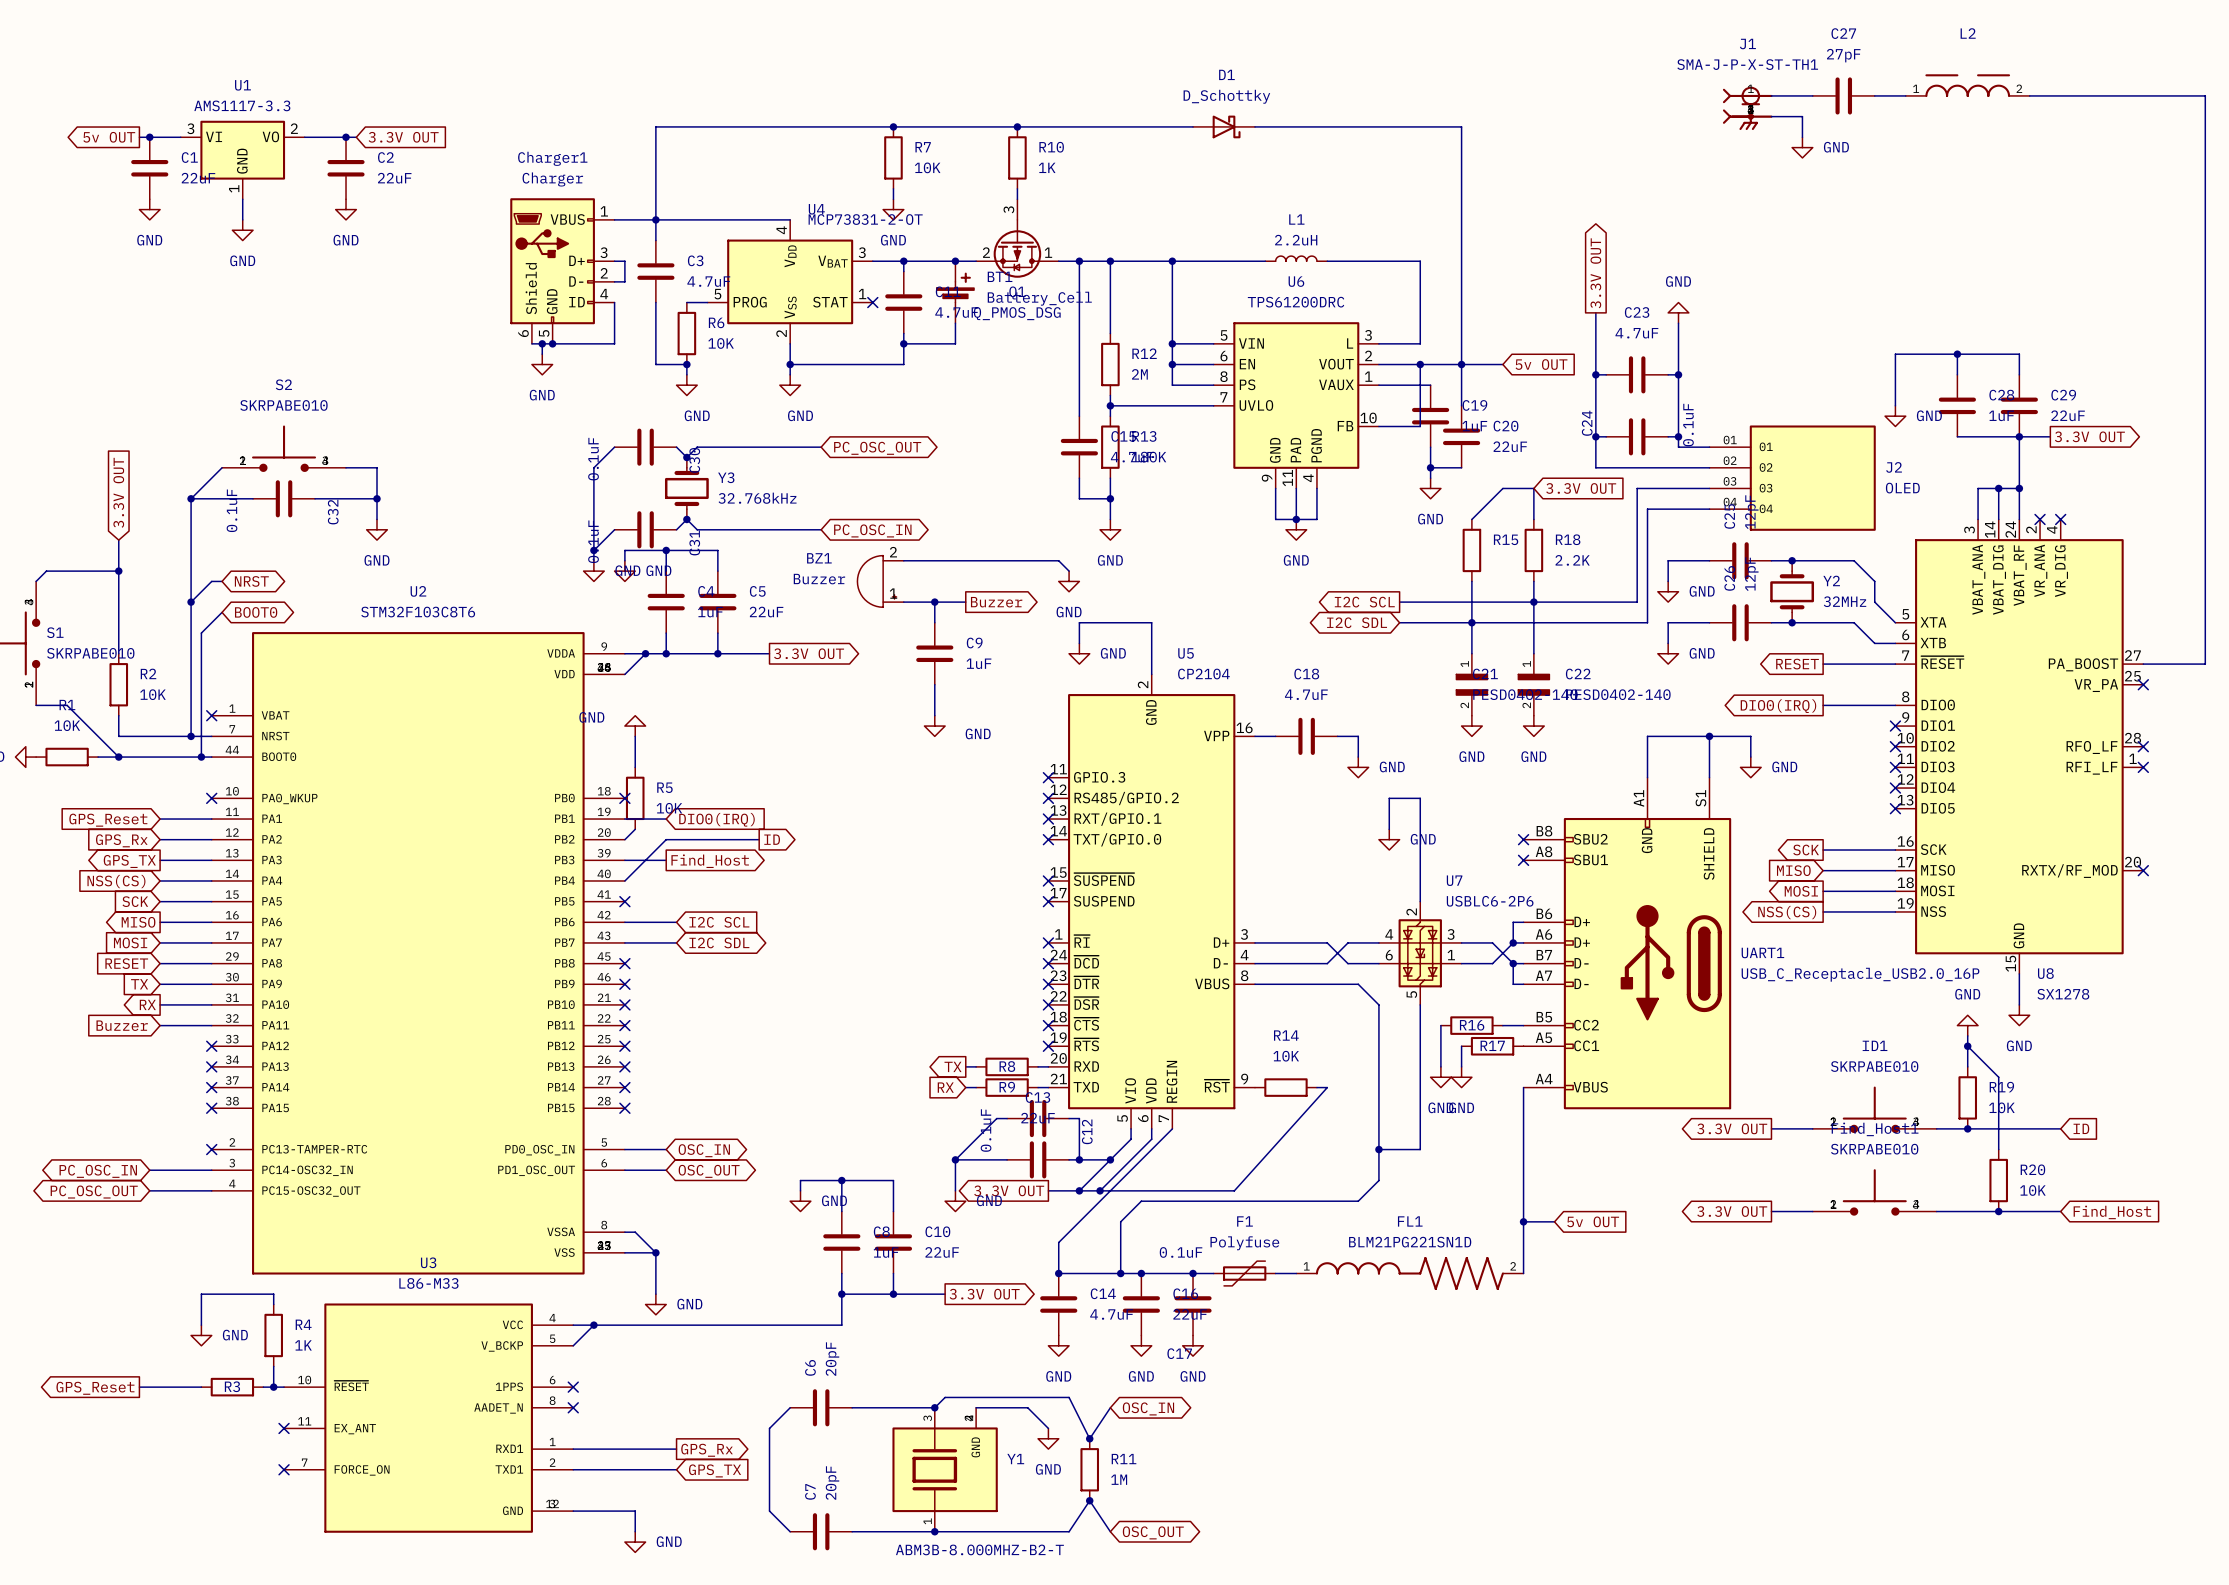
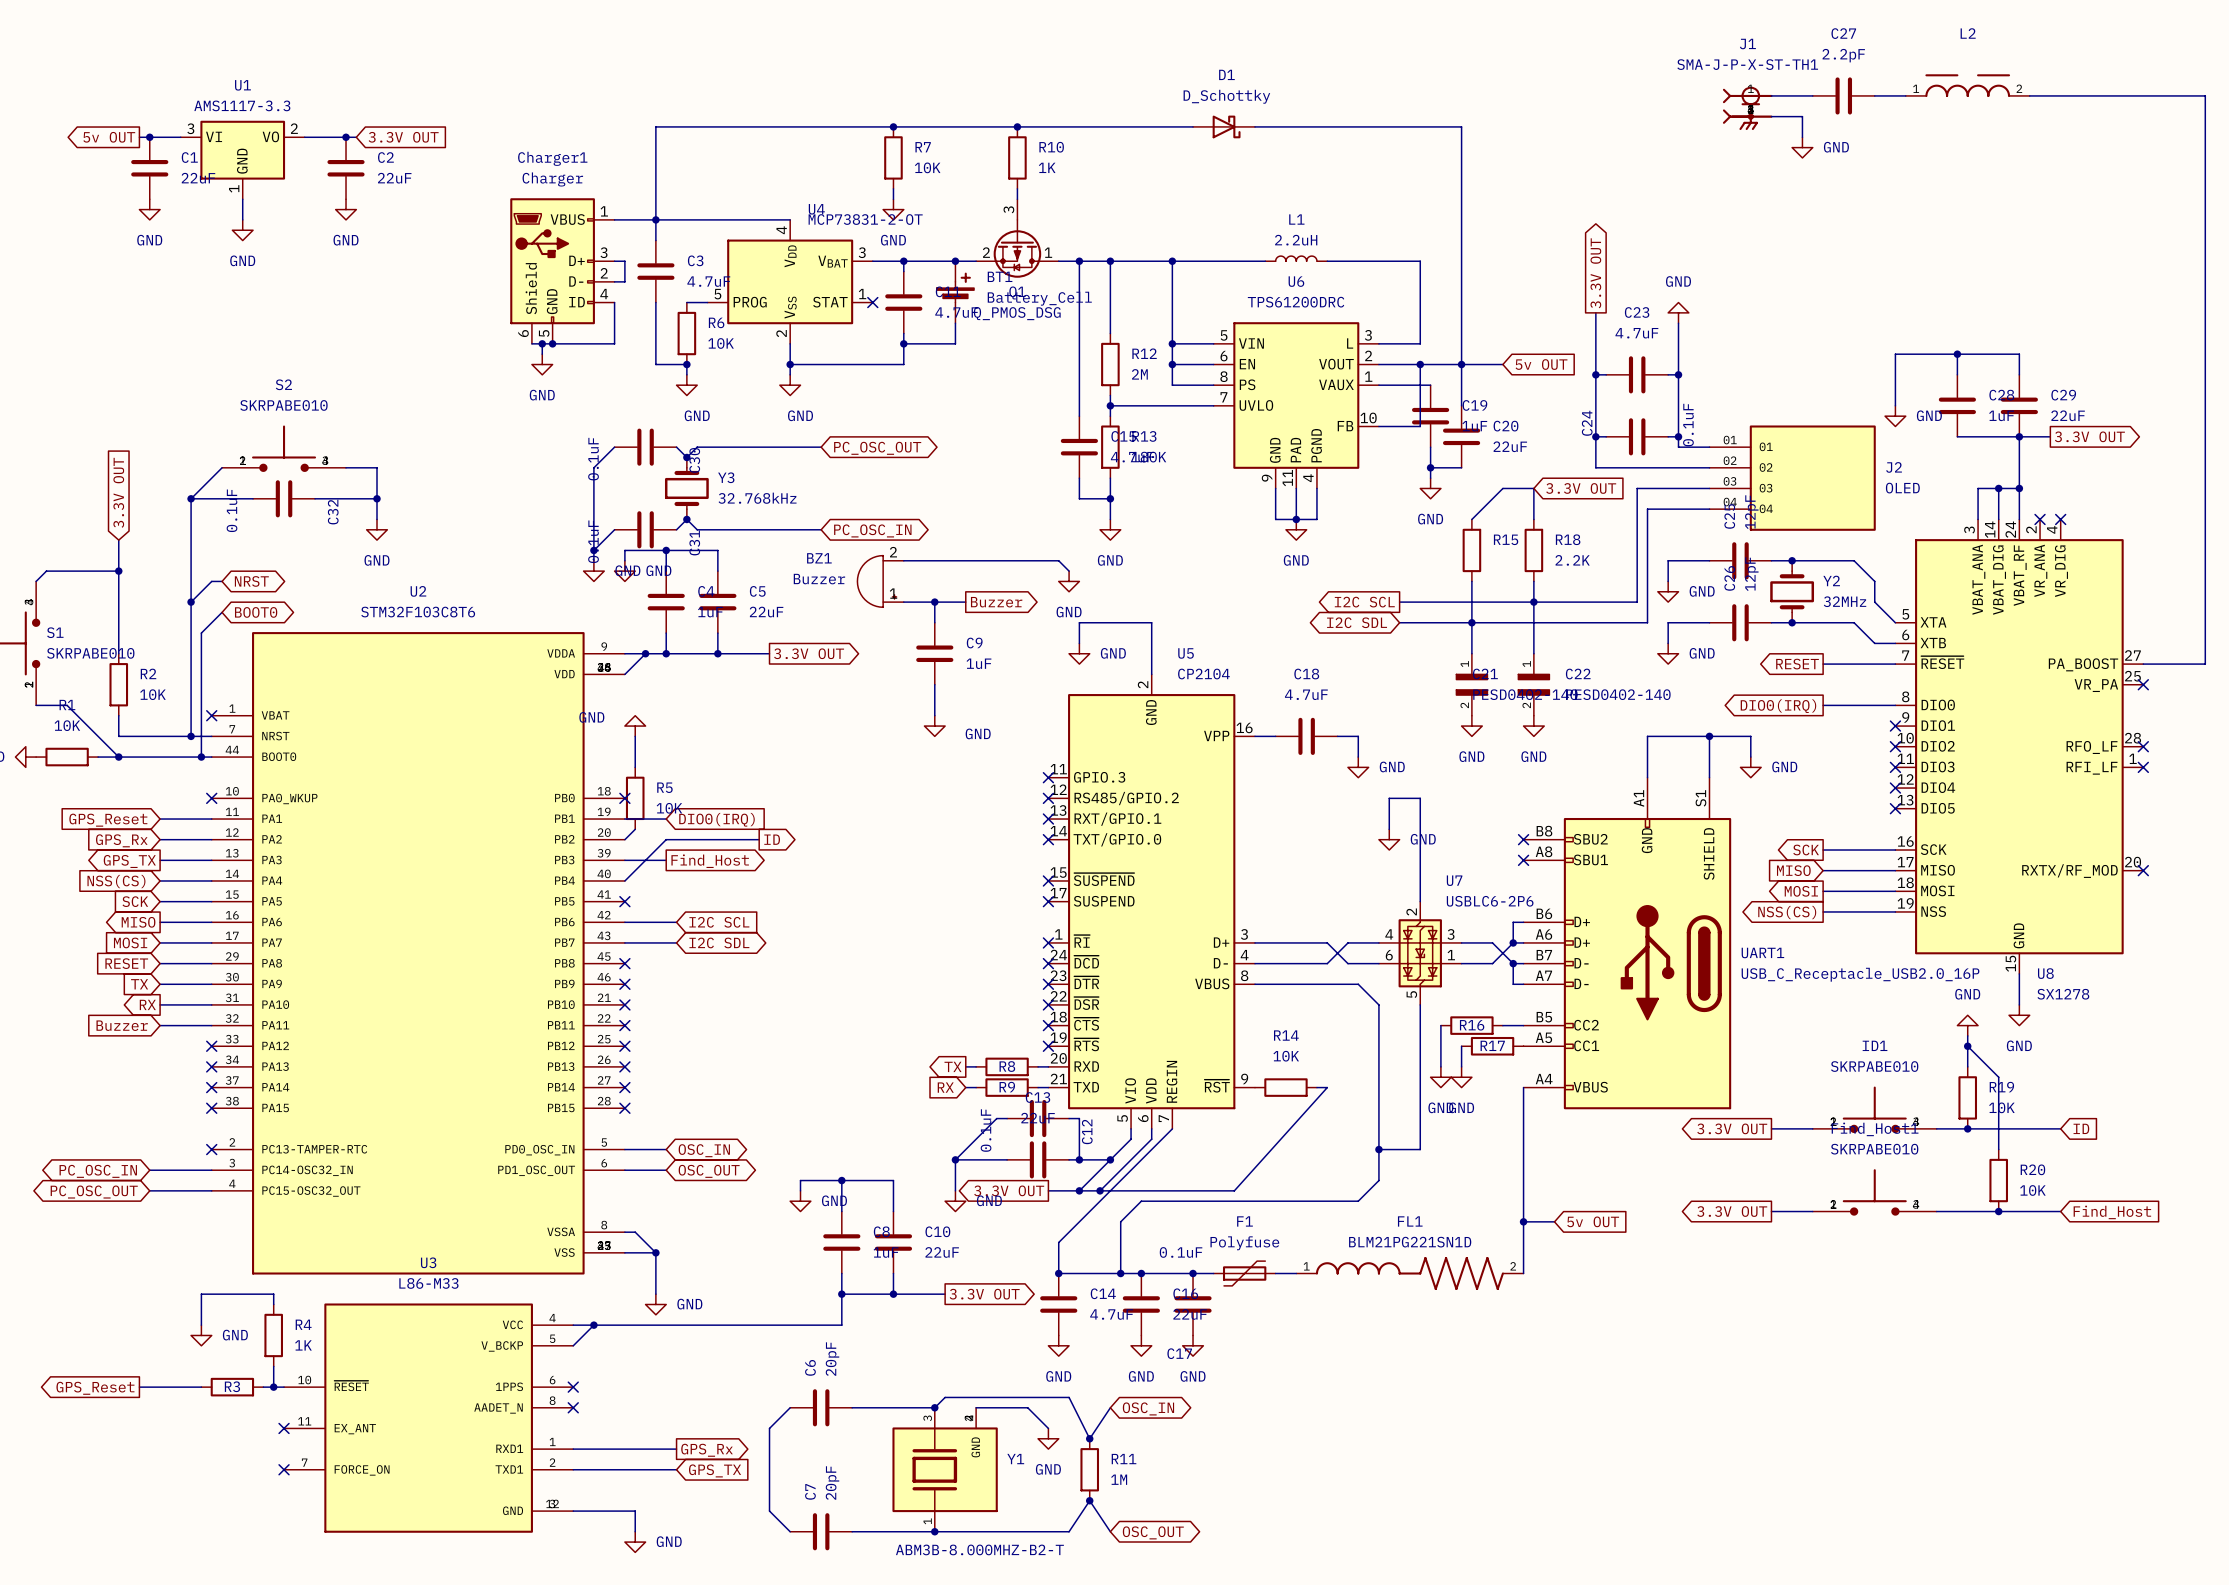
C27 value: 27pF (1843, 55) -> 2.2pF (1843, 55)

